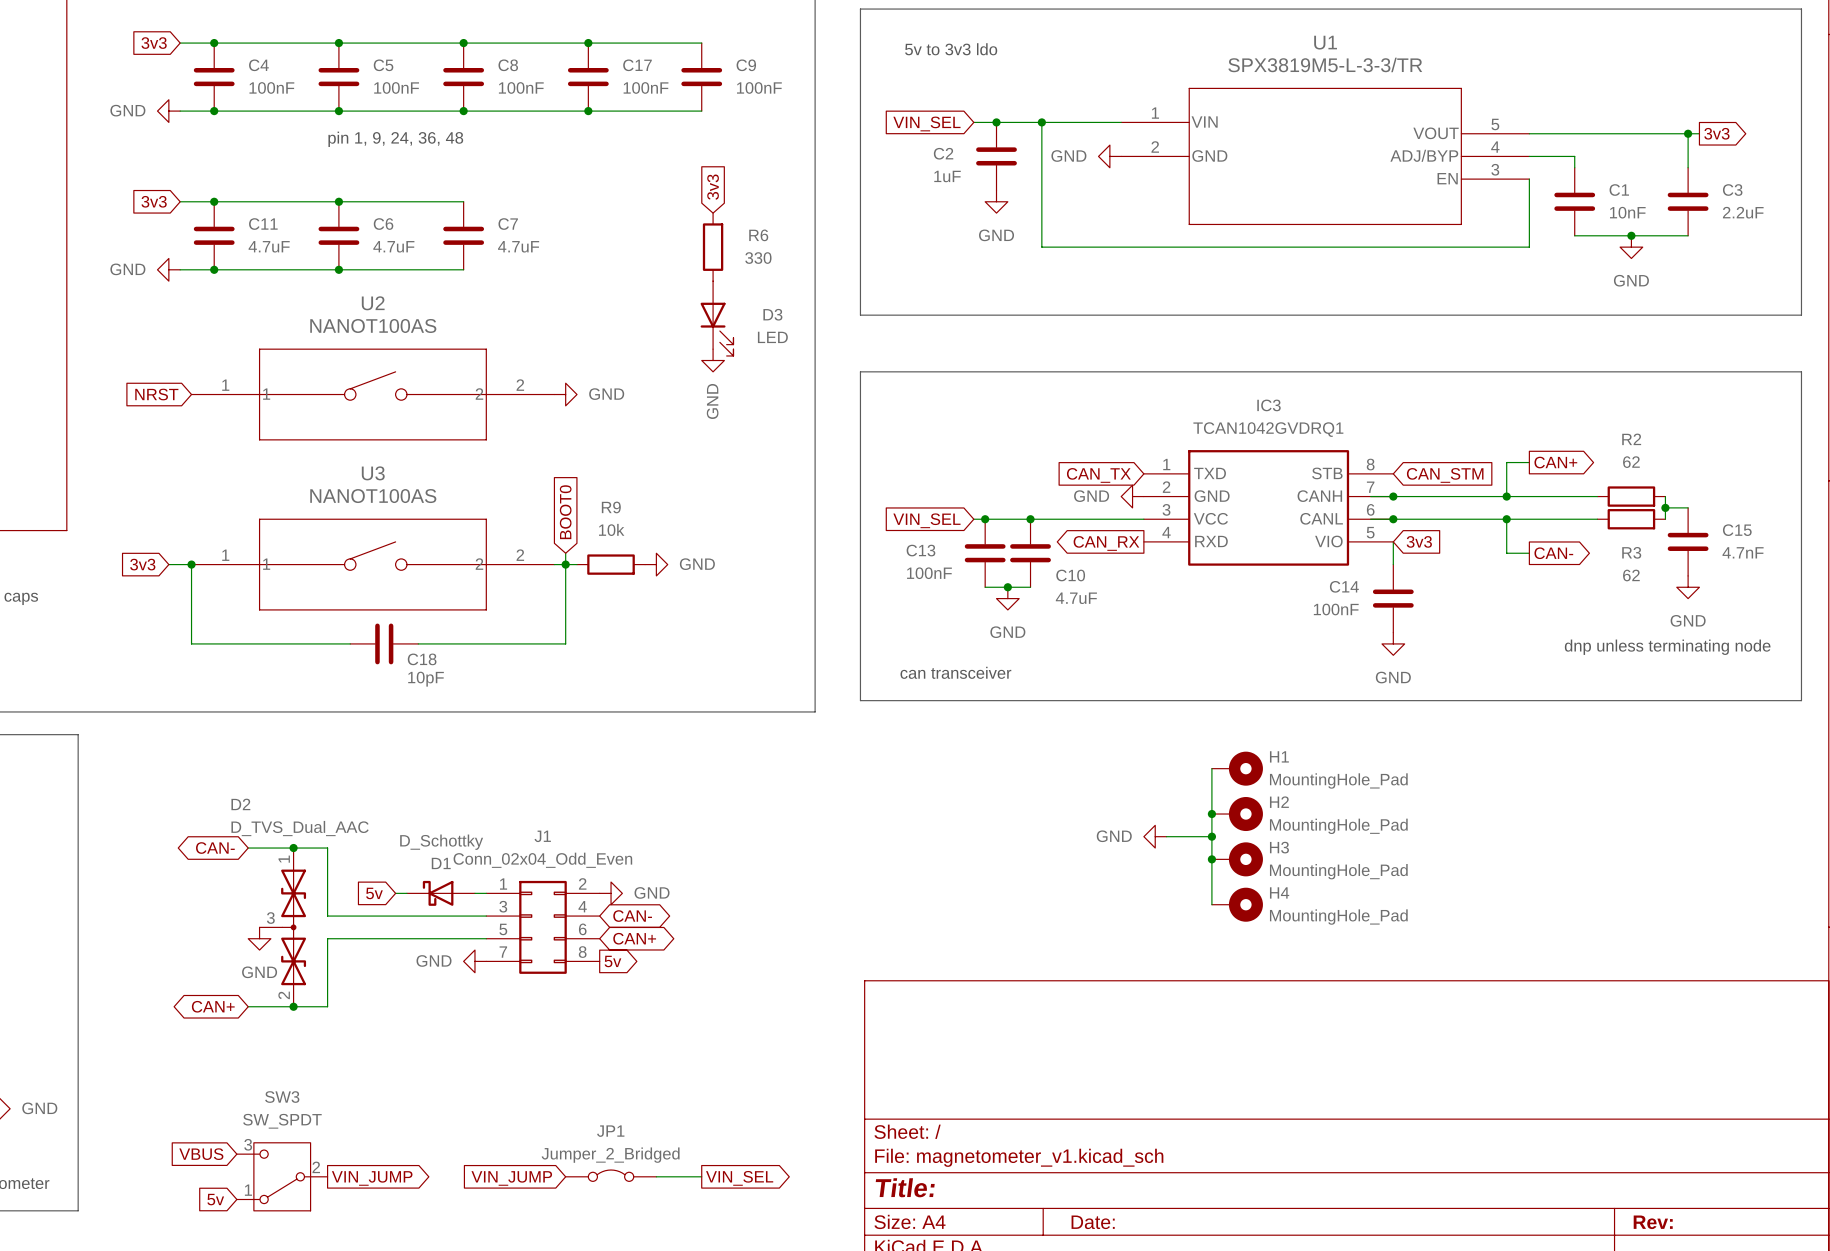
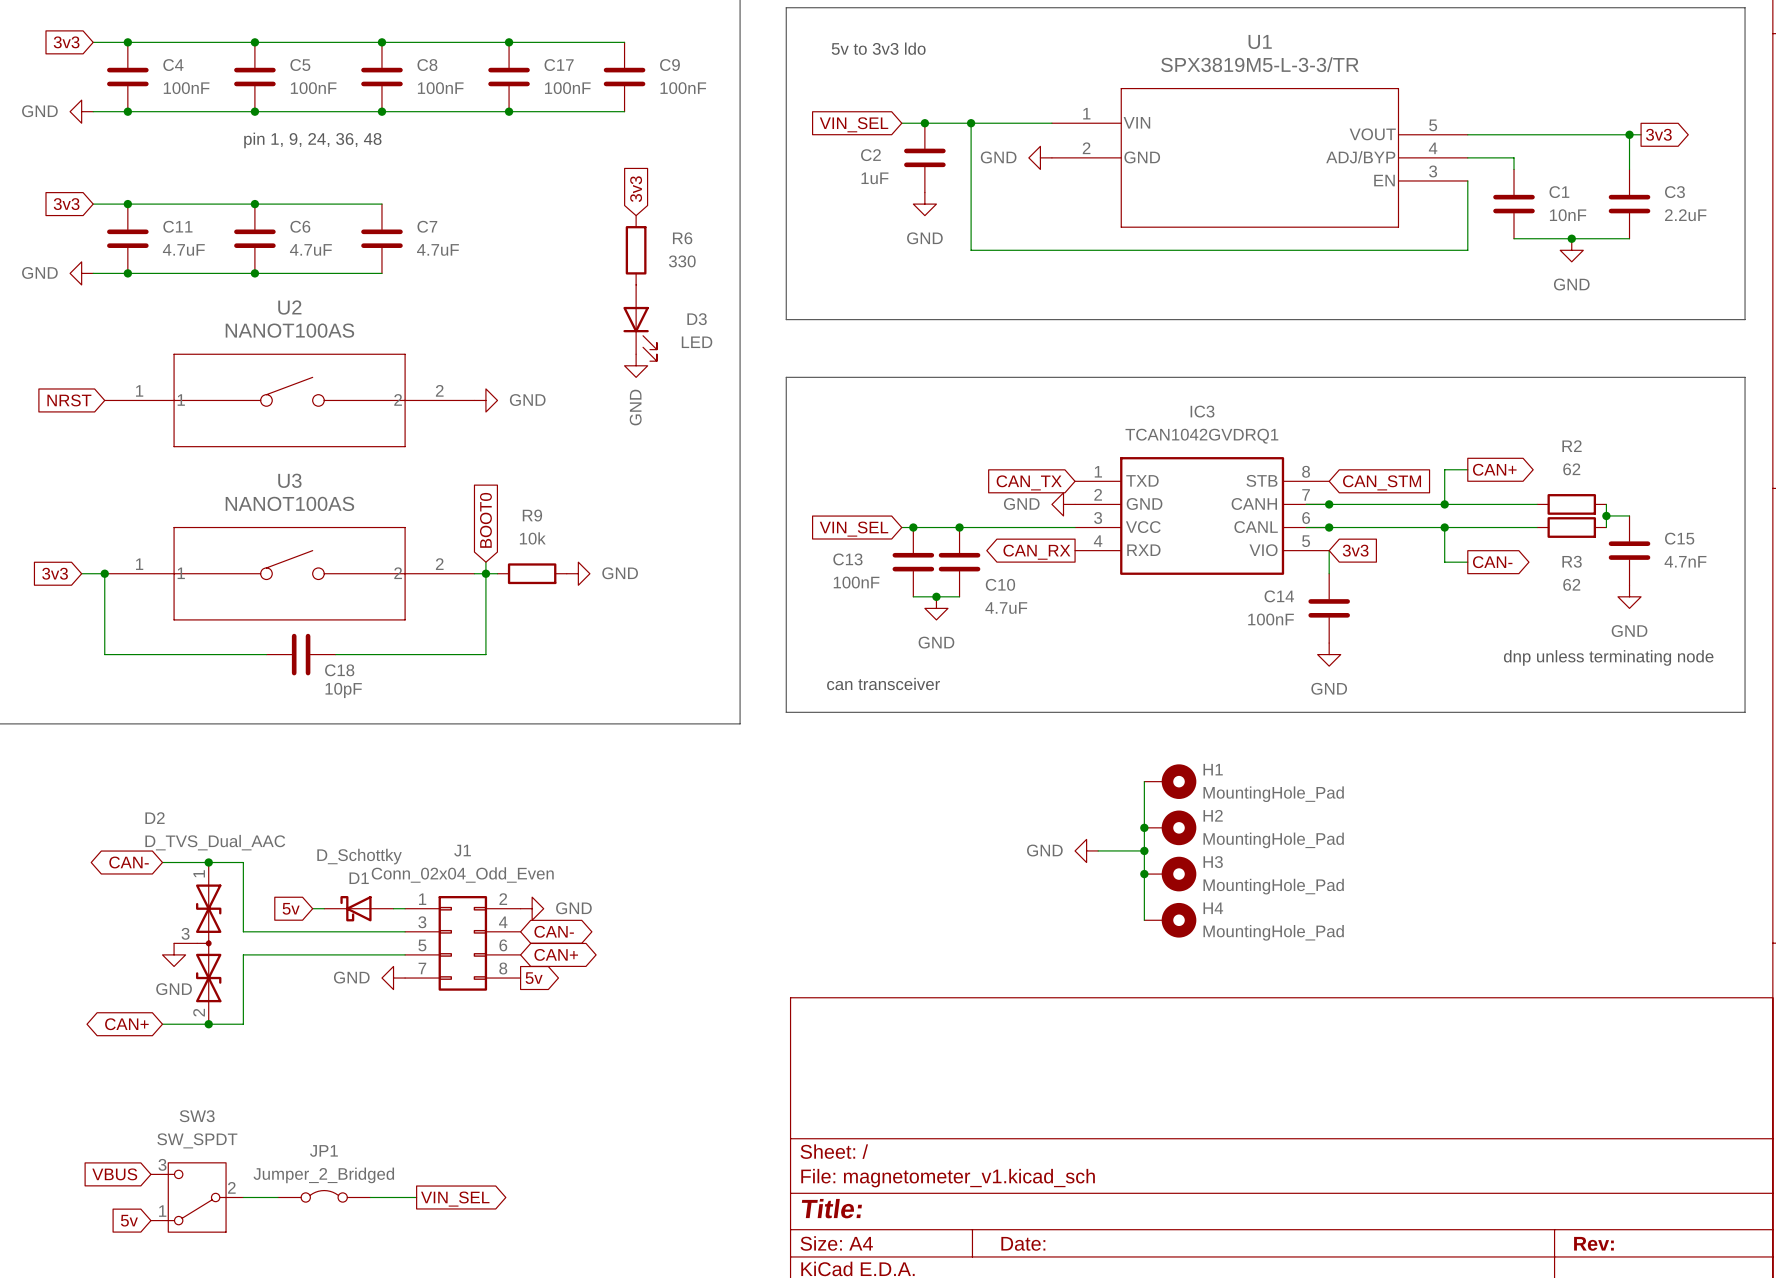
JP1 position: (611, 1175) -> (324, 1196)
wire: none -> (243, 1197) (278, 1197)
wire: (656, 1176) (701, 1176) -> (370, 1197) (416, 1197)
global label: VIN_JUMP (372, 1178) -> none
global label: VIN_JUMP (511, 1178) -> none
global label position: VIN_SEL (739, 1178) -> VIN_SEL (455, 1199)

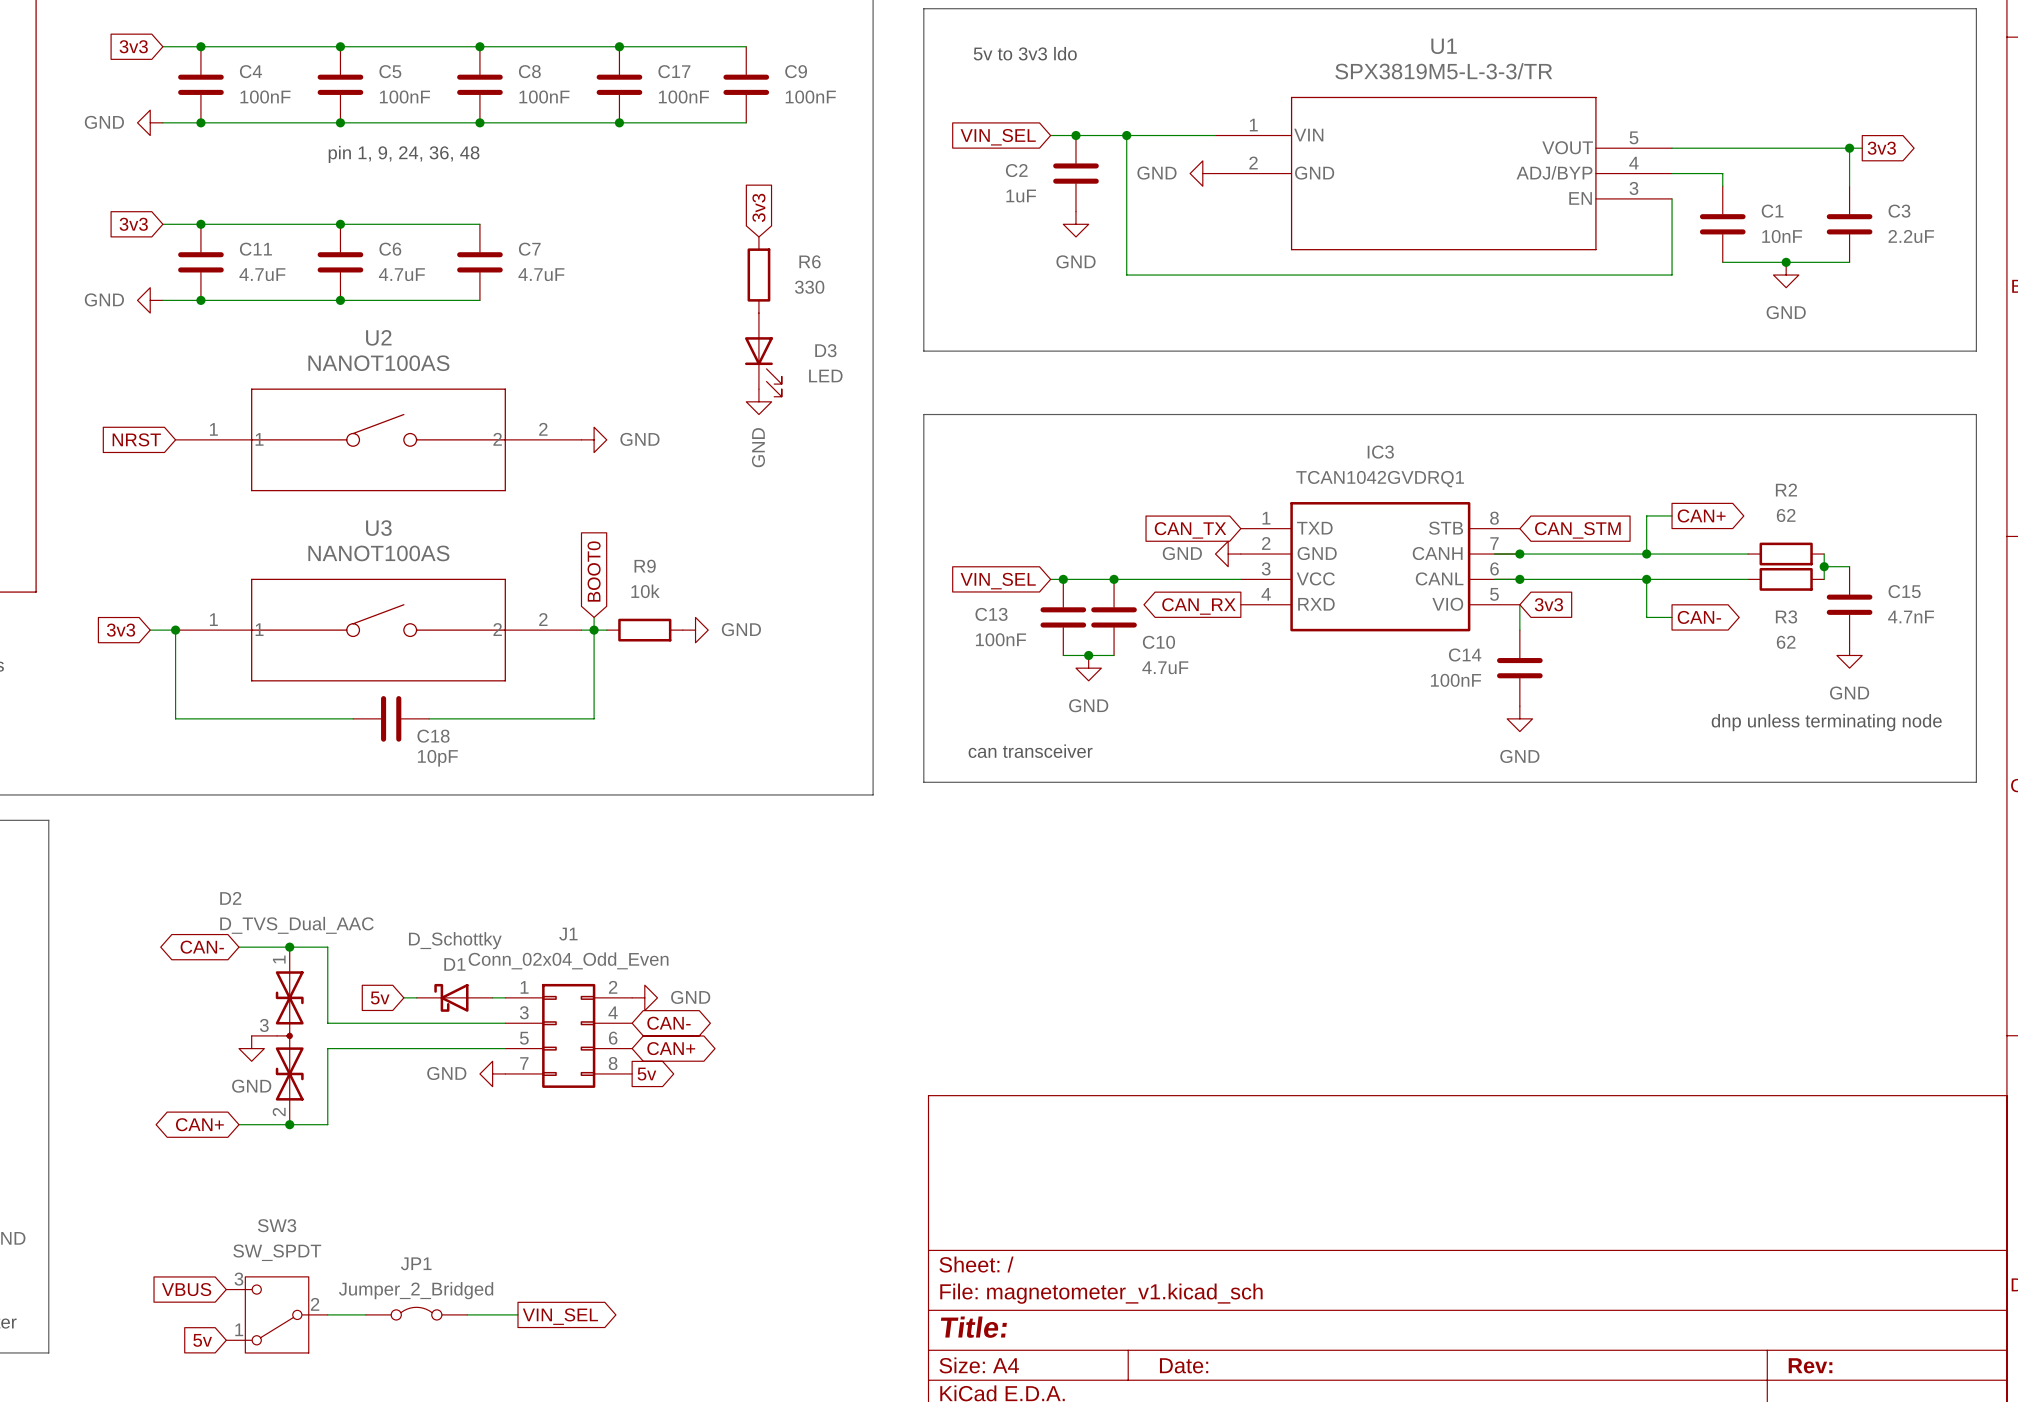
wire: (1144, 781) (1144, 920) -> none
H1: MountingHole_Pad (1170, 781) -> none
junction: (1144, 827) -> none
H2: MountingHole_Pad (1170, 827) -> none
power symbol: GND (1086, 850) -> none
wire: (1098, 850) (1144, 850) -> none
junction: (1144, 850) -> none
junction: (1144, 874) -> none
H3: MountingHole_Pad (1170, 874) -> none
H4: MountingHole_Pad (1170, 920) -> none

